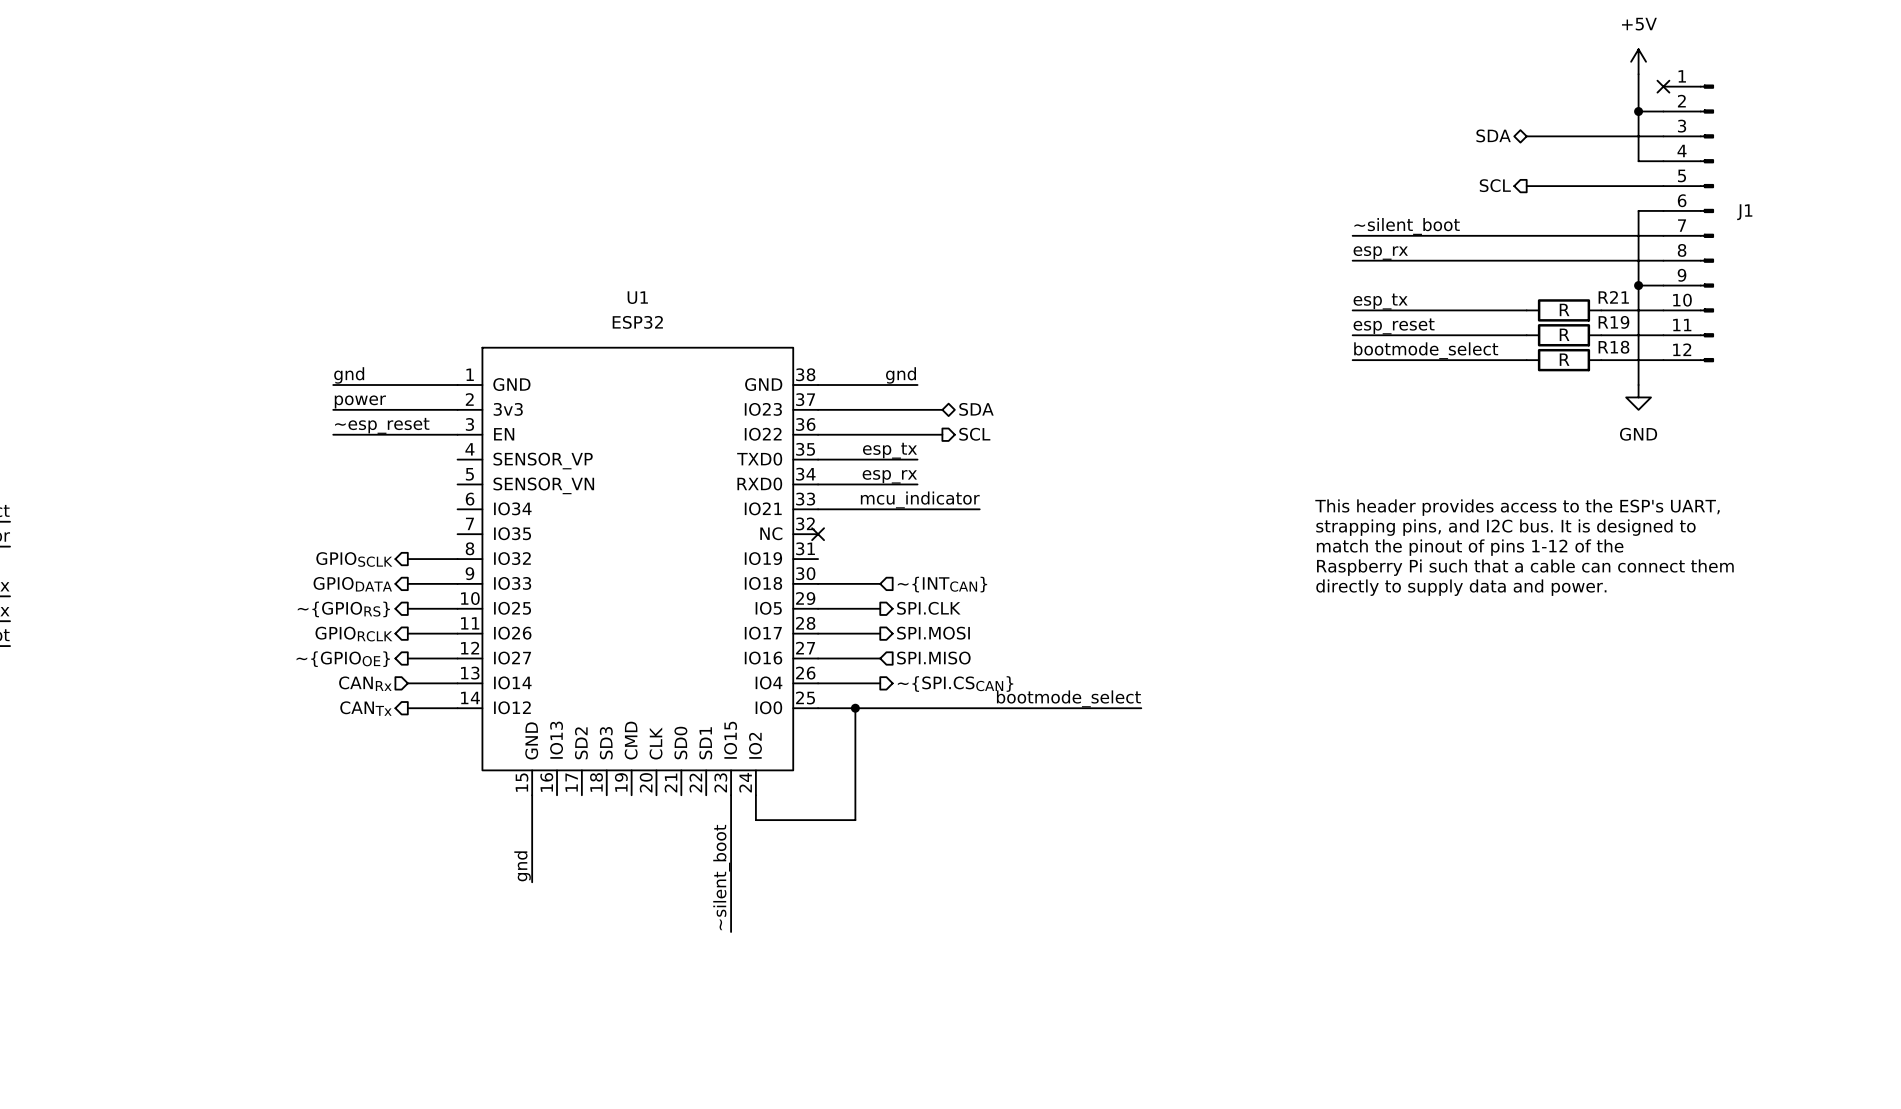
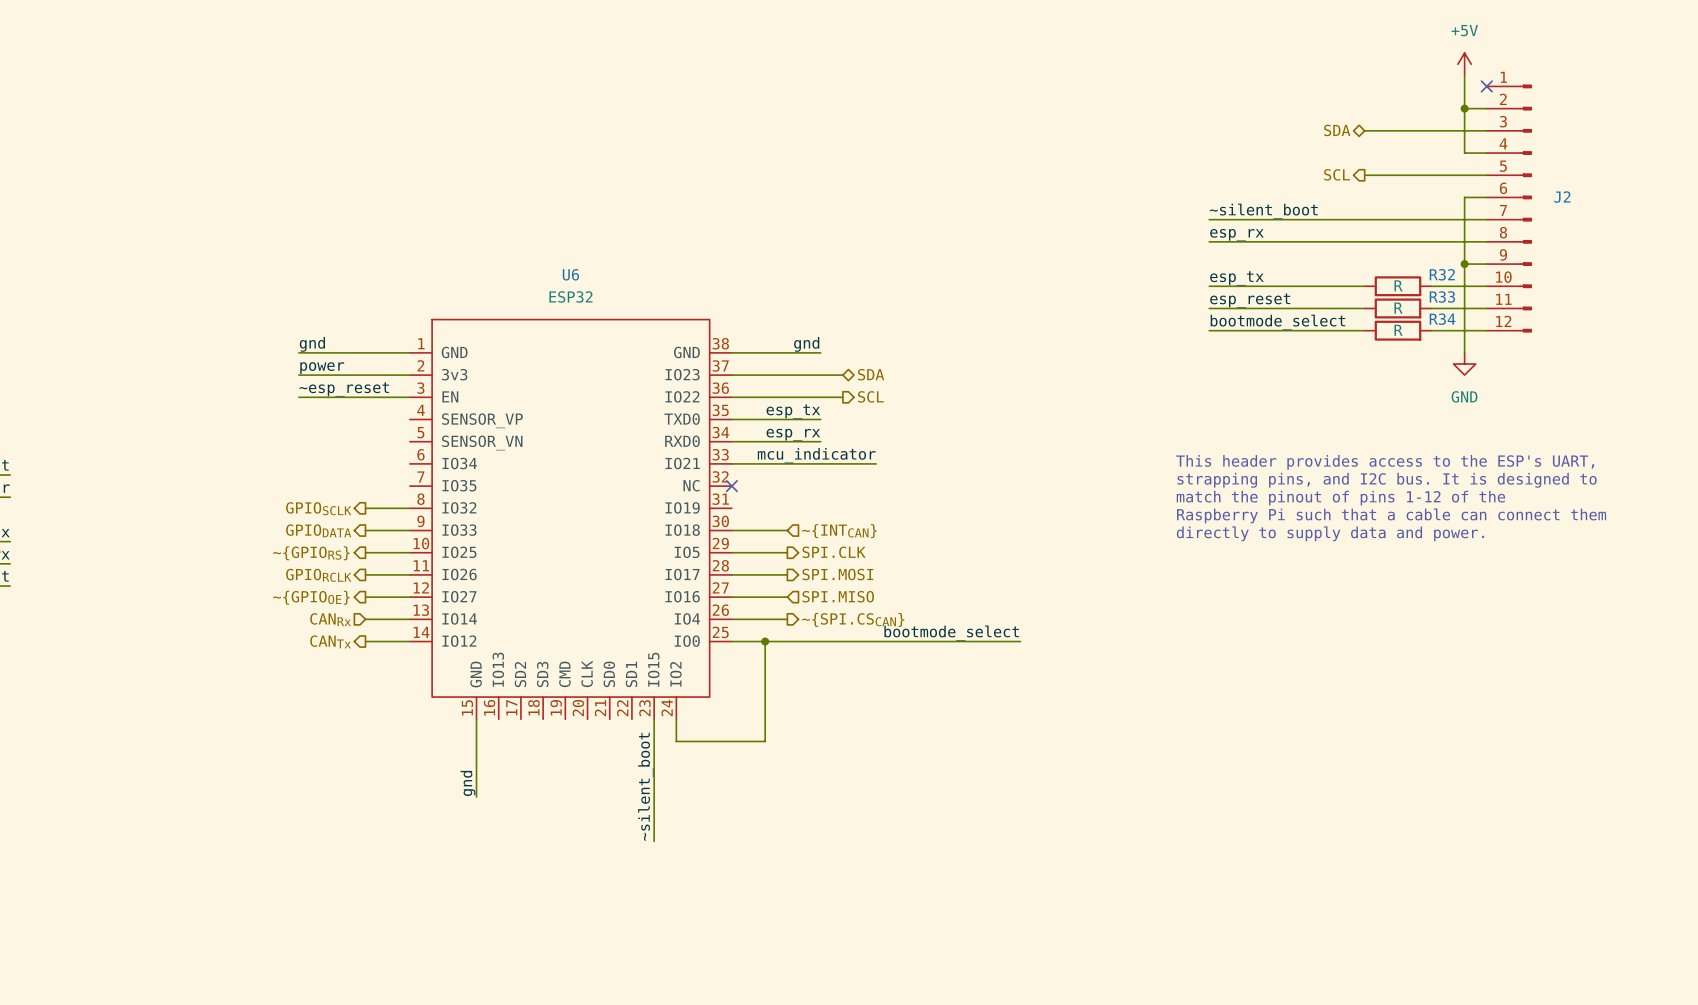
J1 name: J1 (1744, 212) -> J2 (1562, 197)
U1 name: U1 (637, 297) -> U6 (570, 274)
R21 name: R21 (1613, 297) -> R32 (1442, 274)
R19 name: R19 (1613, 322) -> R33 (1442, 296)
R18 name: R18 (1613, 347) -> R34 (1442, 319)

